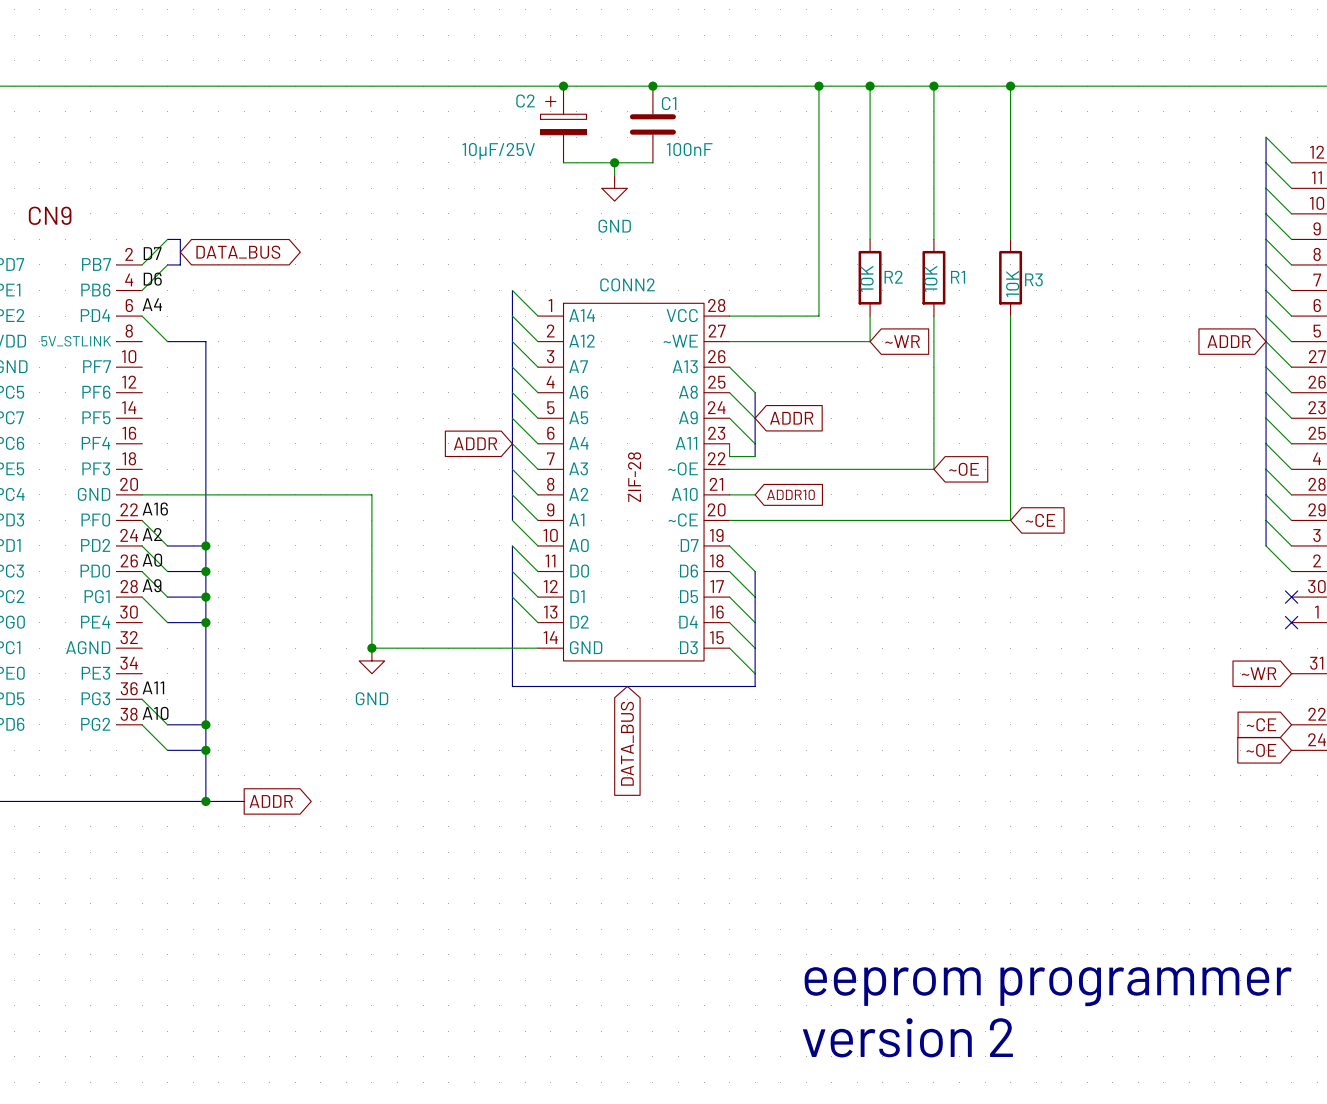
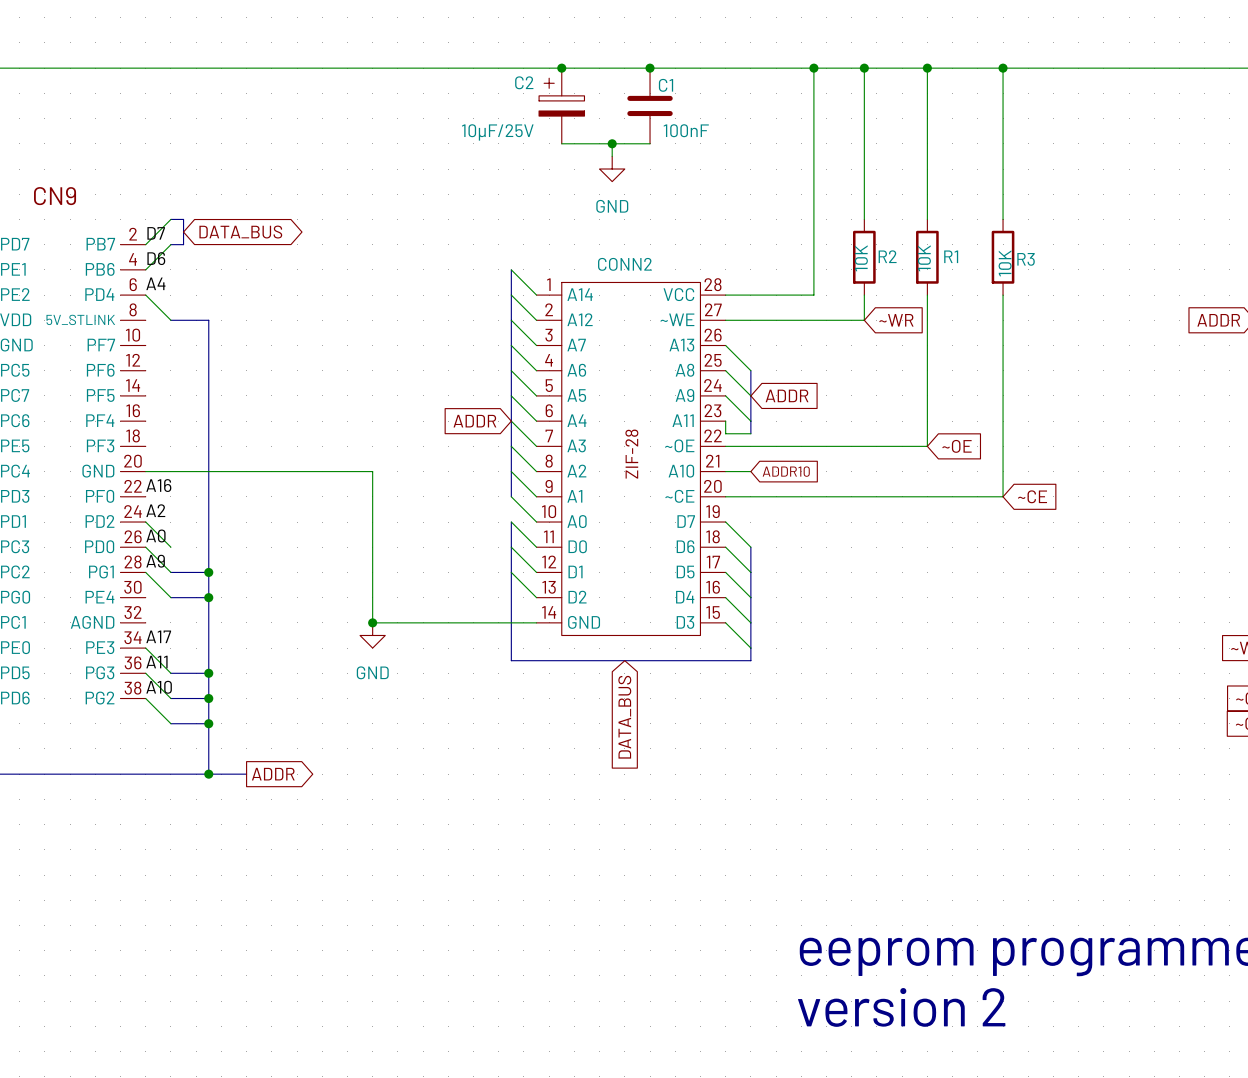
wire: (142, 520) (167, 545) -> (145, 648) (170, 673)
bus: (167, 545) (205, 545) -> none
junction: (205, 545) -> none
bus: (167, 571) (205, 571) -> (170, 673) (208, 673)
junction: (205, 571) -> none
label: none -> A17 (158, 636)
junction: none -> (208, 673)

